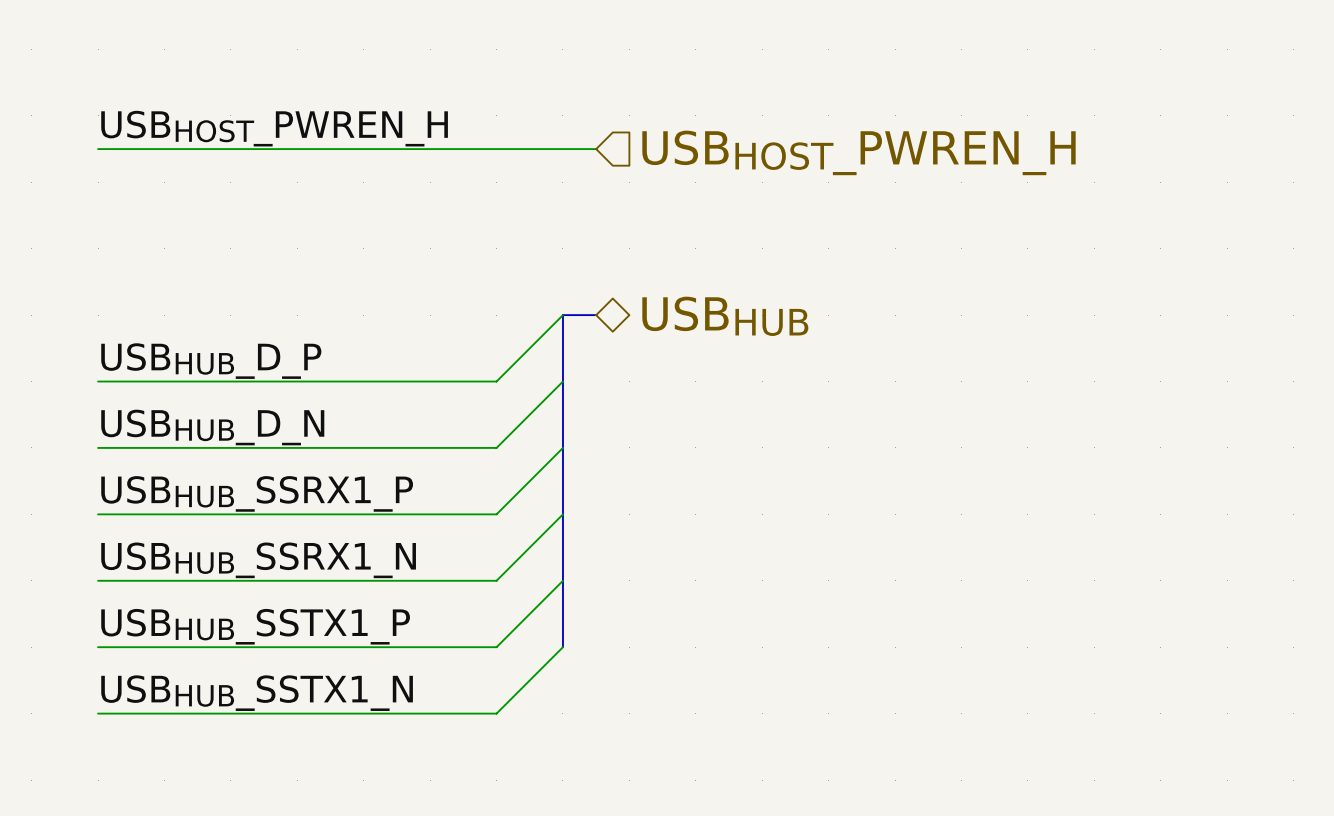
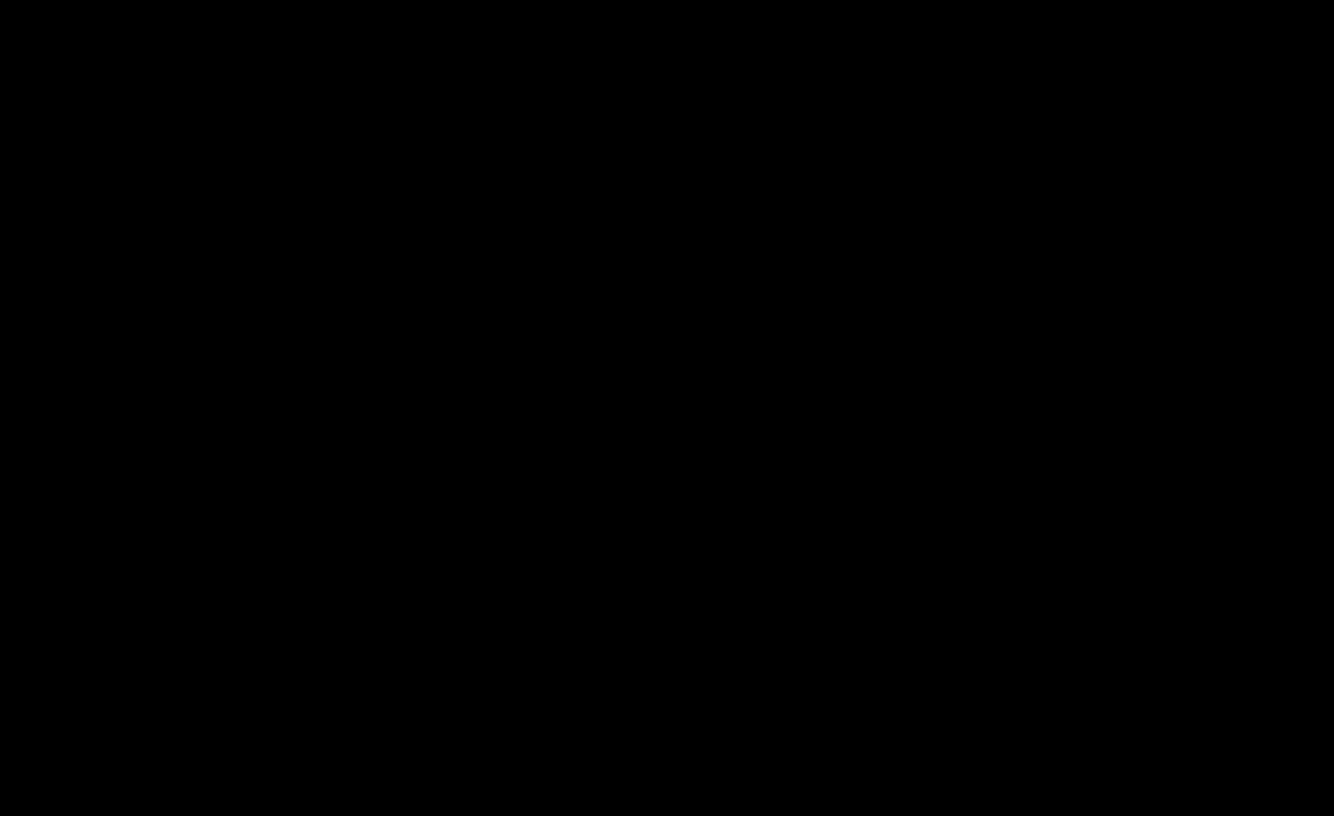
label: USBHOST_PWREN_H (274, 128) -> none
wire: (98, 149) (596, 149) -> none
hierarchical label: USBHOST_PWREN_H (858, 152) -> none
wire: (562, 315) (496, 381) (98, 381) -> none
bus: (596, 315) (562, 315) (562, 647) -> none
hierarchical label: USBHUB (725, 316) -> none
label: USBHUB_D_P (211, 361) -> none
wire: (562, 381) (496, 447) (98, 447) -> none
label: USBHUB_D_N (212, 427) -> none
wire: (562, 447) (496, 514) (98, 514) -> none
label: USBHUB_SSRX1_P (257, 493) -> none
wire: (562, 514) (496, 580) (98, 580) -> none
label: USBHUB_SSRX1_N (258, 560) -> none
wire: (562, 580) (496, 647) (98, 647) -> none
label: USBHUB_SSTX1_P (255, 626) -> none
wire: (562, 647) (496, 713) (98, 713) -> none
label: USBHUB_SSTX1_N (257, 693) -> none

